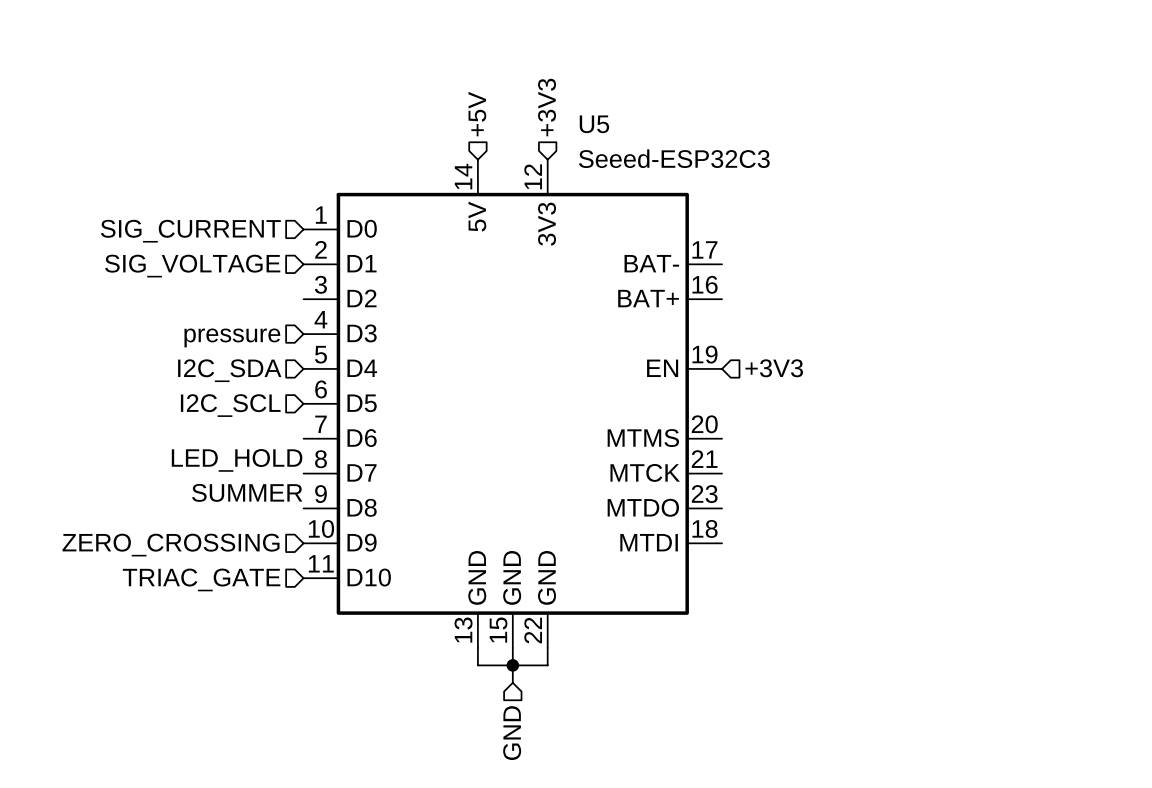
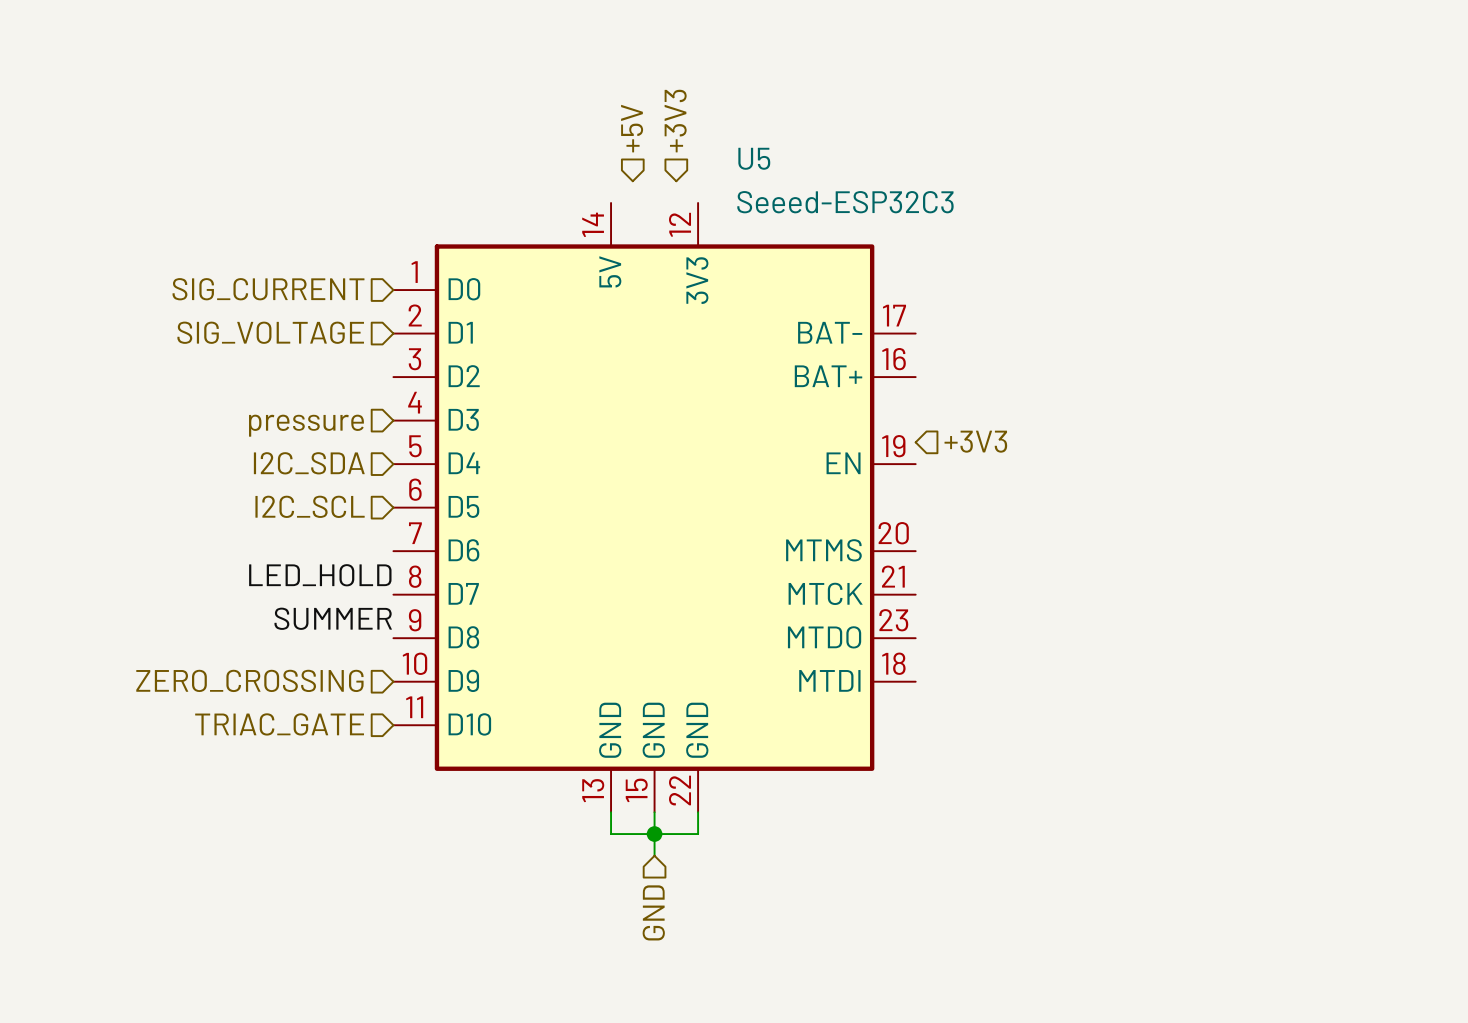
hierarchical label position: +3V3 (547, 107) -> +3V3 (675, 121)
hierarchical label position: +5V (477, 114) -> +5V (632, 128)
hierarchical label position: +3V3 (774, 368) -> +3V3 (975, 441)

